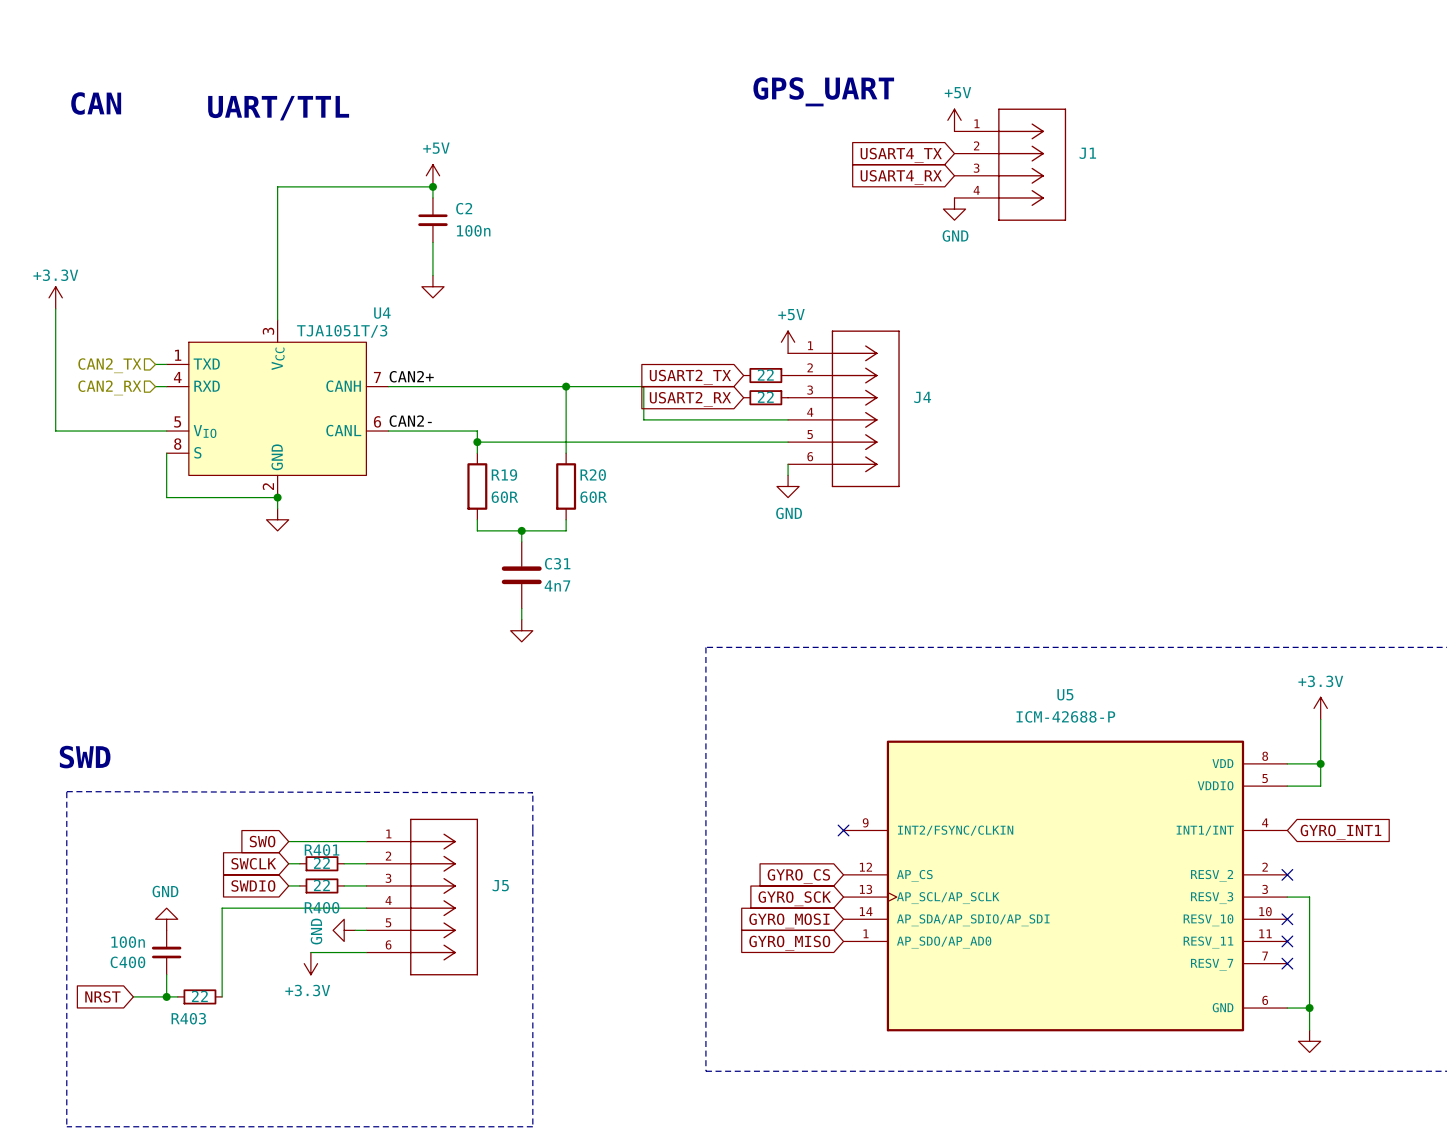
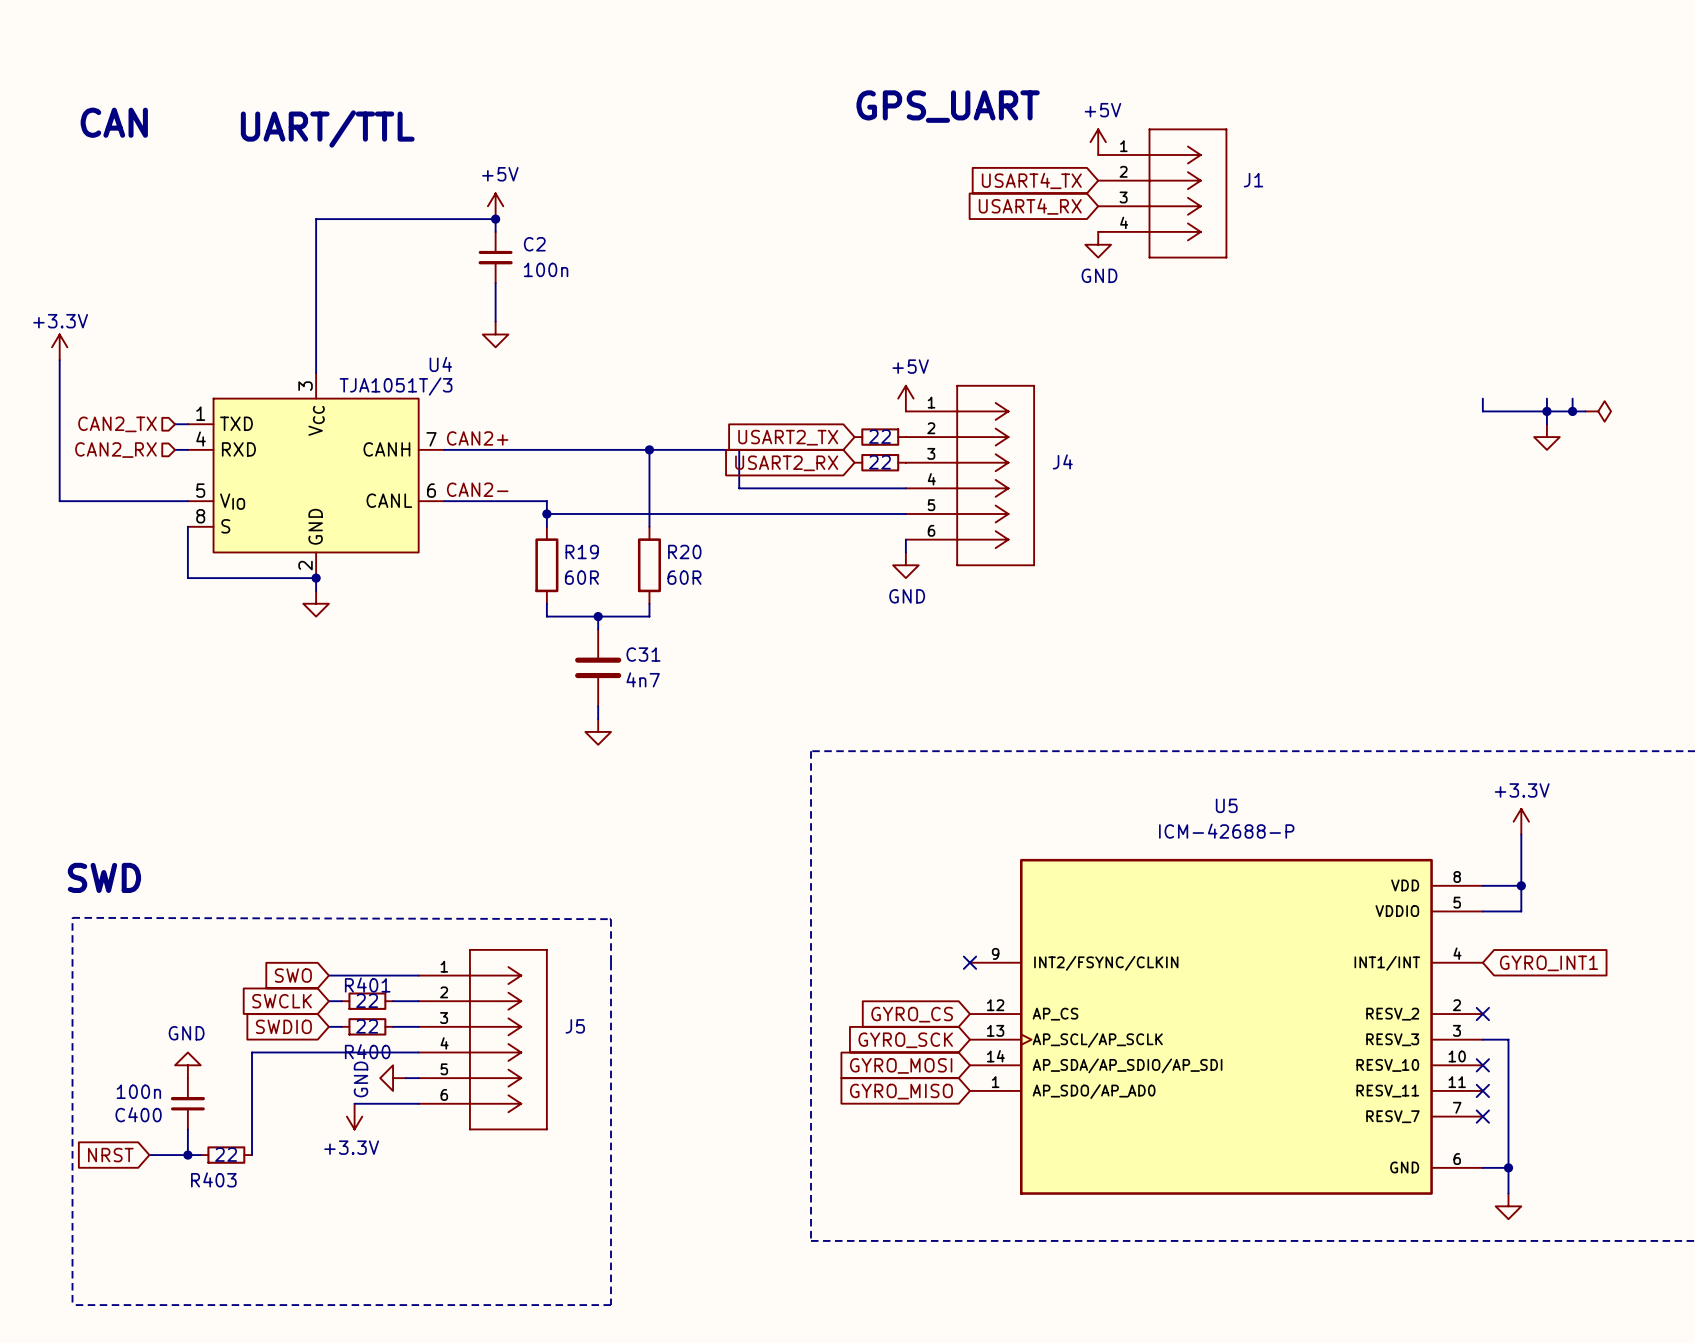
wire: none -> (1482, 398) (1482, 411) (1585, 411)
wire: none -> (1546, 398) (1546, 424)
wire: none -> (1572, 398) (1572, 411)
junction: none -> (1546, 411)
junction: none -> (1572, 411)
power symbol: none -> (1598, 411)
power symbol: none -> (1546, 437)

